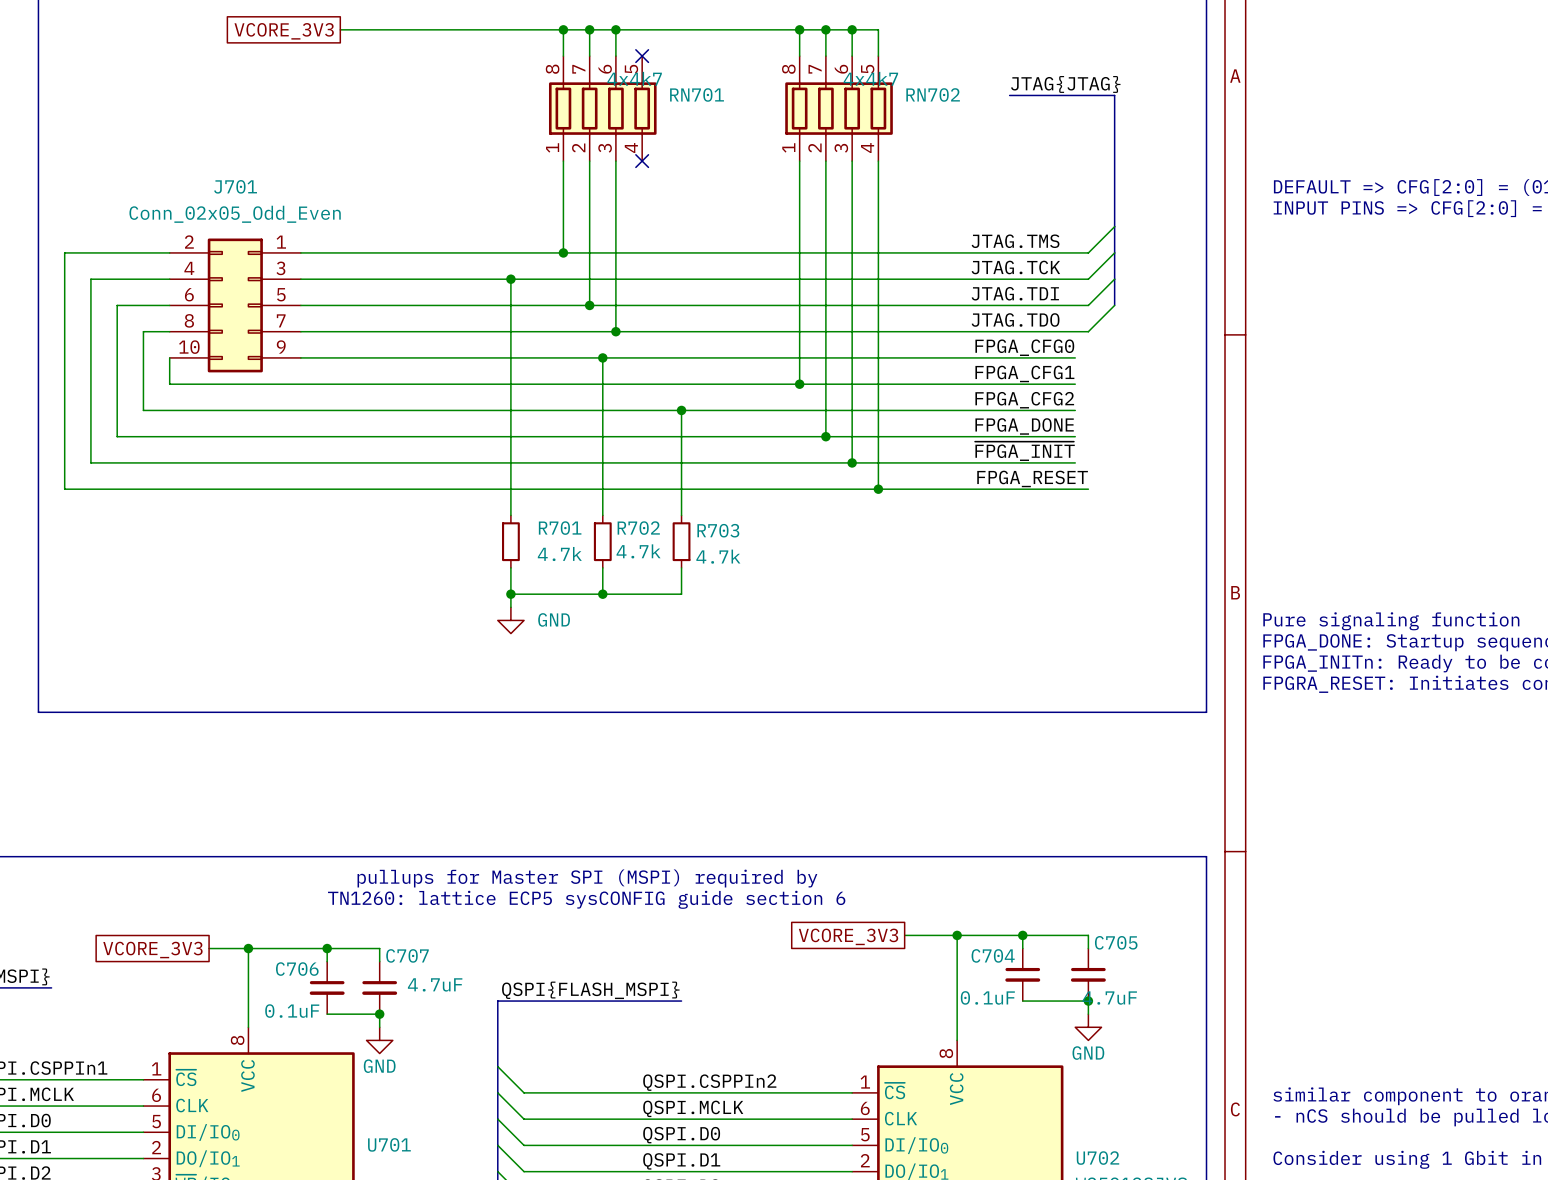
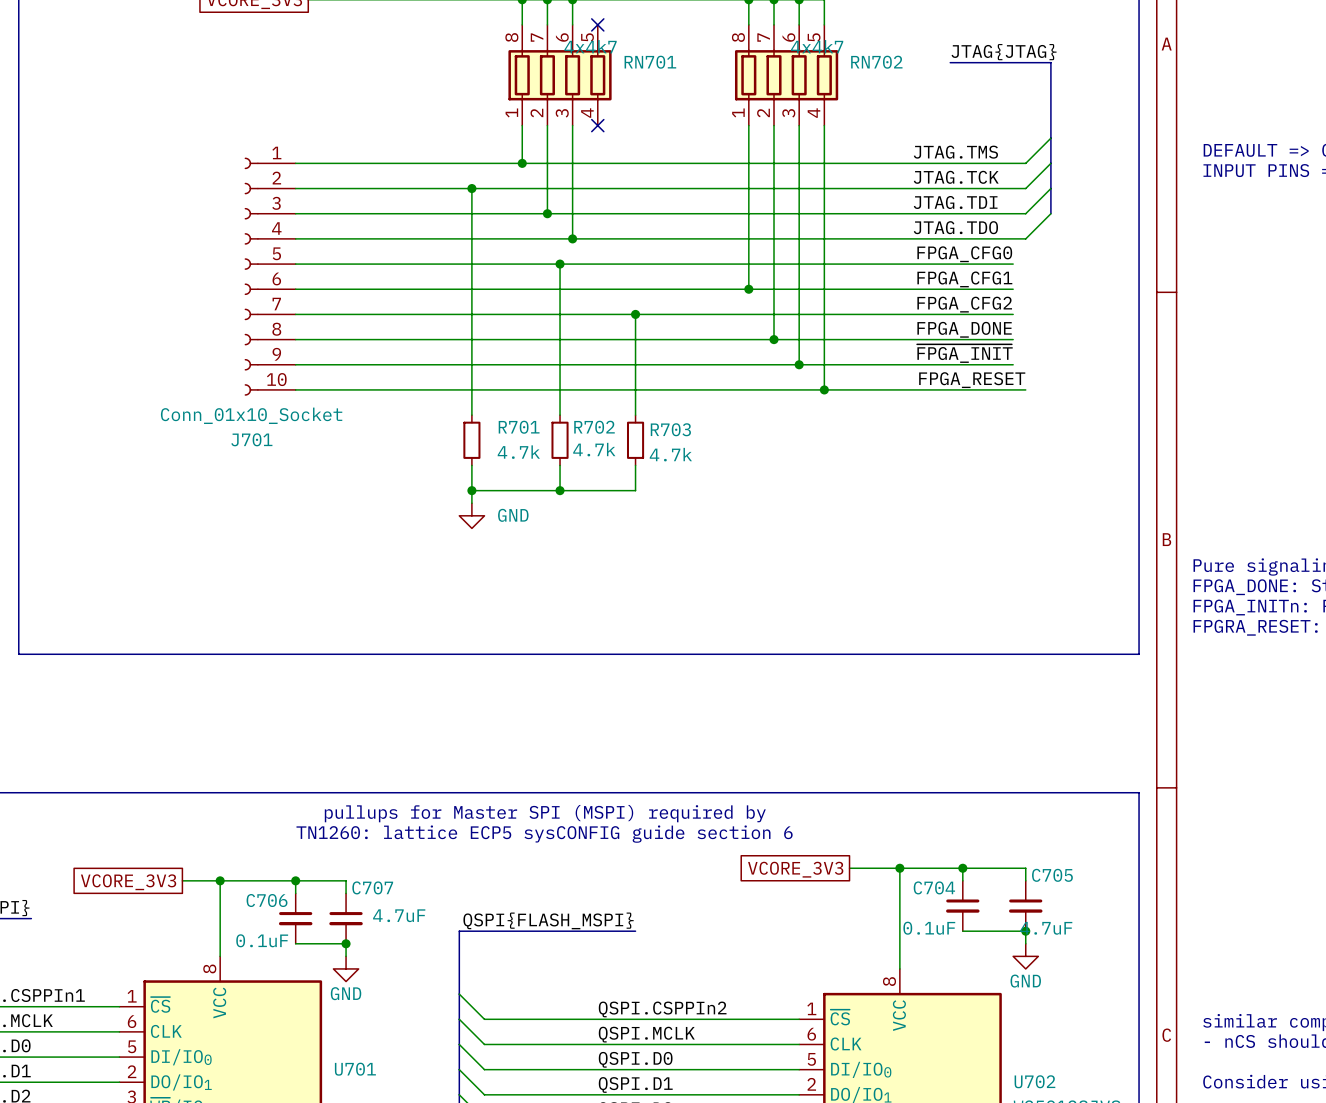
wire: none -> (1050, 138) (1025, 163) (295, 163)
J701 name position: J701 (235, 186) -> J701 (251, 439)
label: none -> JTAG.TMS (955, 152)
wire: (563, 200) (563, 252) -> (471, 188) (471, 238)
junction: none -> (522, 163)
wire: none -> (1050, 163) (1025, 188) (295, 188)
J701 value: Conn_02x05_Odd_Even (235, 214) -> Conn_01x10_Socket (251, 415)
label: none -> JTAG.TCK (956, 177)
junction: none -> (471, 188)
J701 symbol: [169, 238, 301, 373] -> [244, 157, 296, 396]
label: JTAG.TMS (1015, 241) -> JTAG.TDI (955, 202)
wire: (169, 252) (64, 252) (64, 489) (1088, 489) -> none
junction: (563, 252) -> none
wire: (589, 252) (589, 305) -> none
junction: none -> (547, 213)
bus: (1114, 252) (1114, 305) -> none
label: JTAG.TCK (1015, 267) -> JTAG.TDO (955, 227)
wire: (169, 279) (90, 279) (90, 462) (1075, 462) -> none
junction: (510, 279) -> none
wire: (615, 279) (615, 331) -> (560, 264) (560, 314)
junction: none -> (572, 238)
wire: (1114, 279) (1088, 305) (1075, 305) -> none
label: JTAG.TDI (1015, 293) -> none
label: none -> FPGA_CFG0 (964, 254)
wire: (169, 305) (117, 305) (117, 436) (327, 436) -> none
junction position: (589, 305) -> (560, 264)
wire: (1114, 305) (1088, 331) (1075, 331) -> none
label: JTAG.TDO (1015, 319) -> none
label: none -> FPGA_CFG1 (964, 279)
wire: (169, 331) (143, 331) (143, 410) (327, 410) -> none
junction: (615, 331) -> none
wire: (799, 331) (799, 384) -> (635, 314) (635, 364)
junction: none -> (748, 289)
label: FPGA_CFG0 (1024, 347) -> FPGA_CFG2 (964, 304)
wire: (169, 357) (169, 384) (327, 384) -> none
junction: (602, 357) -> none
junction: none -> (635, 314)
label: FPGA_CFG1 (1024, 373) -> FPGA_DONE (964, 329)
junction: (799, 384) -> none
wire: (825, 384) (825, 436) -> none
junction: none -> (774, 339)
label: FPGA_CFG2 (1024, 400) -> ~{FPGA_INIT} (964, 353)
junction: (681, 410) -> none
wire: (852, 410) (852, 462) -> none
junction: none -> (799, 364)
label: FPGA_DONE (1024, 426) -> none
junction: (825, 436) -> none
wire: (878, 436) (878, 489) -> none
junction: none -> (824, 389)
wire: none -> (1013, 389) (1025, 389)
label: ~{FPGA_INIT} (1024, 451) -> none
wire: (510, 462) (510, 515) -> (471, 503) (471, 465)
wire: (602, 462) (602, 515) -> (560, 490) (560, 465)
wire: (681, 462) (681, 515) -> (471, 490) (635, 490) (635, 465)
junction: (852, 462) -> none
label position: FPGA_RESET (1032, 478) -> FPGA_RESET (972, 380)
junction: (878, 489) -> none
R701 position: (510, 541) -> (471, 440)
R702 position: (602, 541) -> (560, 440)
R703 position: (681, 541) -> (635, 440)
wire: (510, 567) (510, 607) -> none
wire: (602, 567) (602, 594) -> none
wire: (681, 567) (681, 594) (510, 594) -> none
junction position: (510, 594) -> (471, 490)
junction position: (602, 594) -> (560, 490)
power symbol position: GND (510, 620) -> GND (471, 515)

